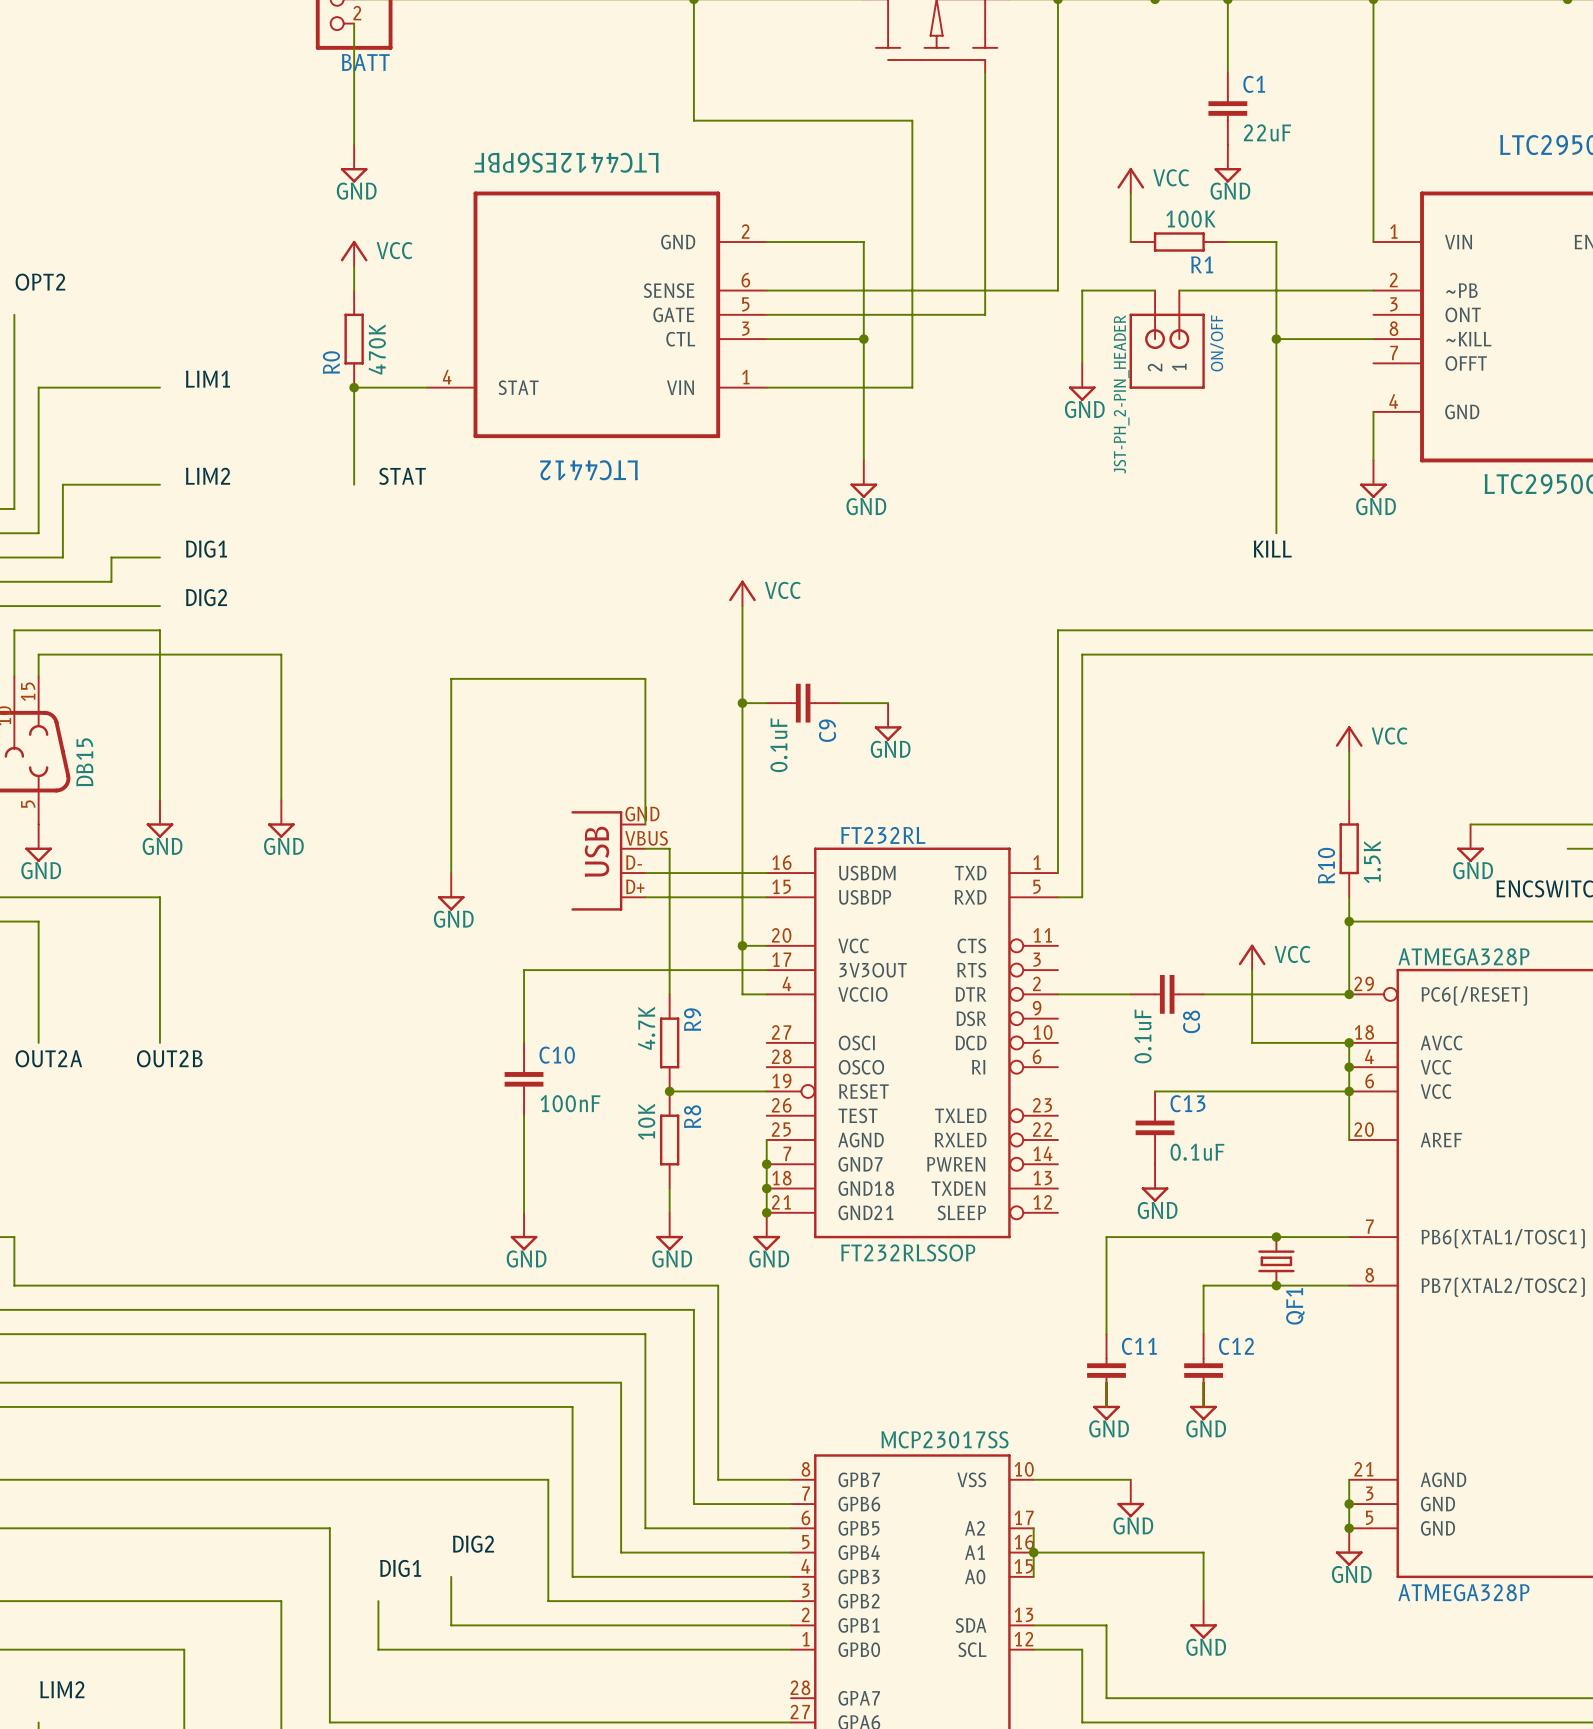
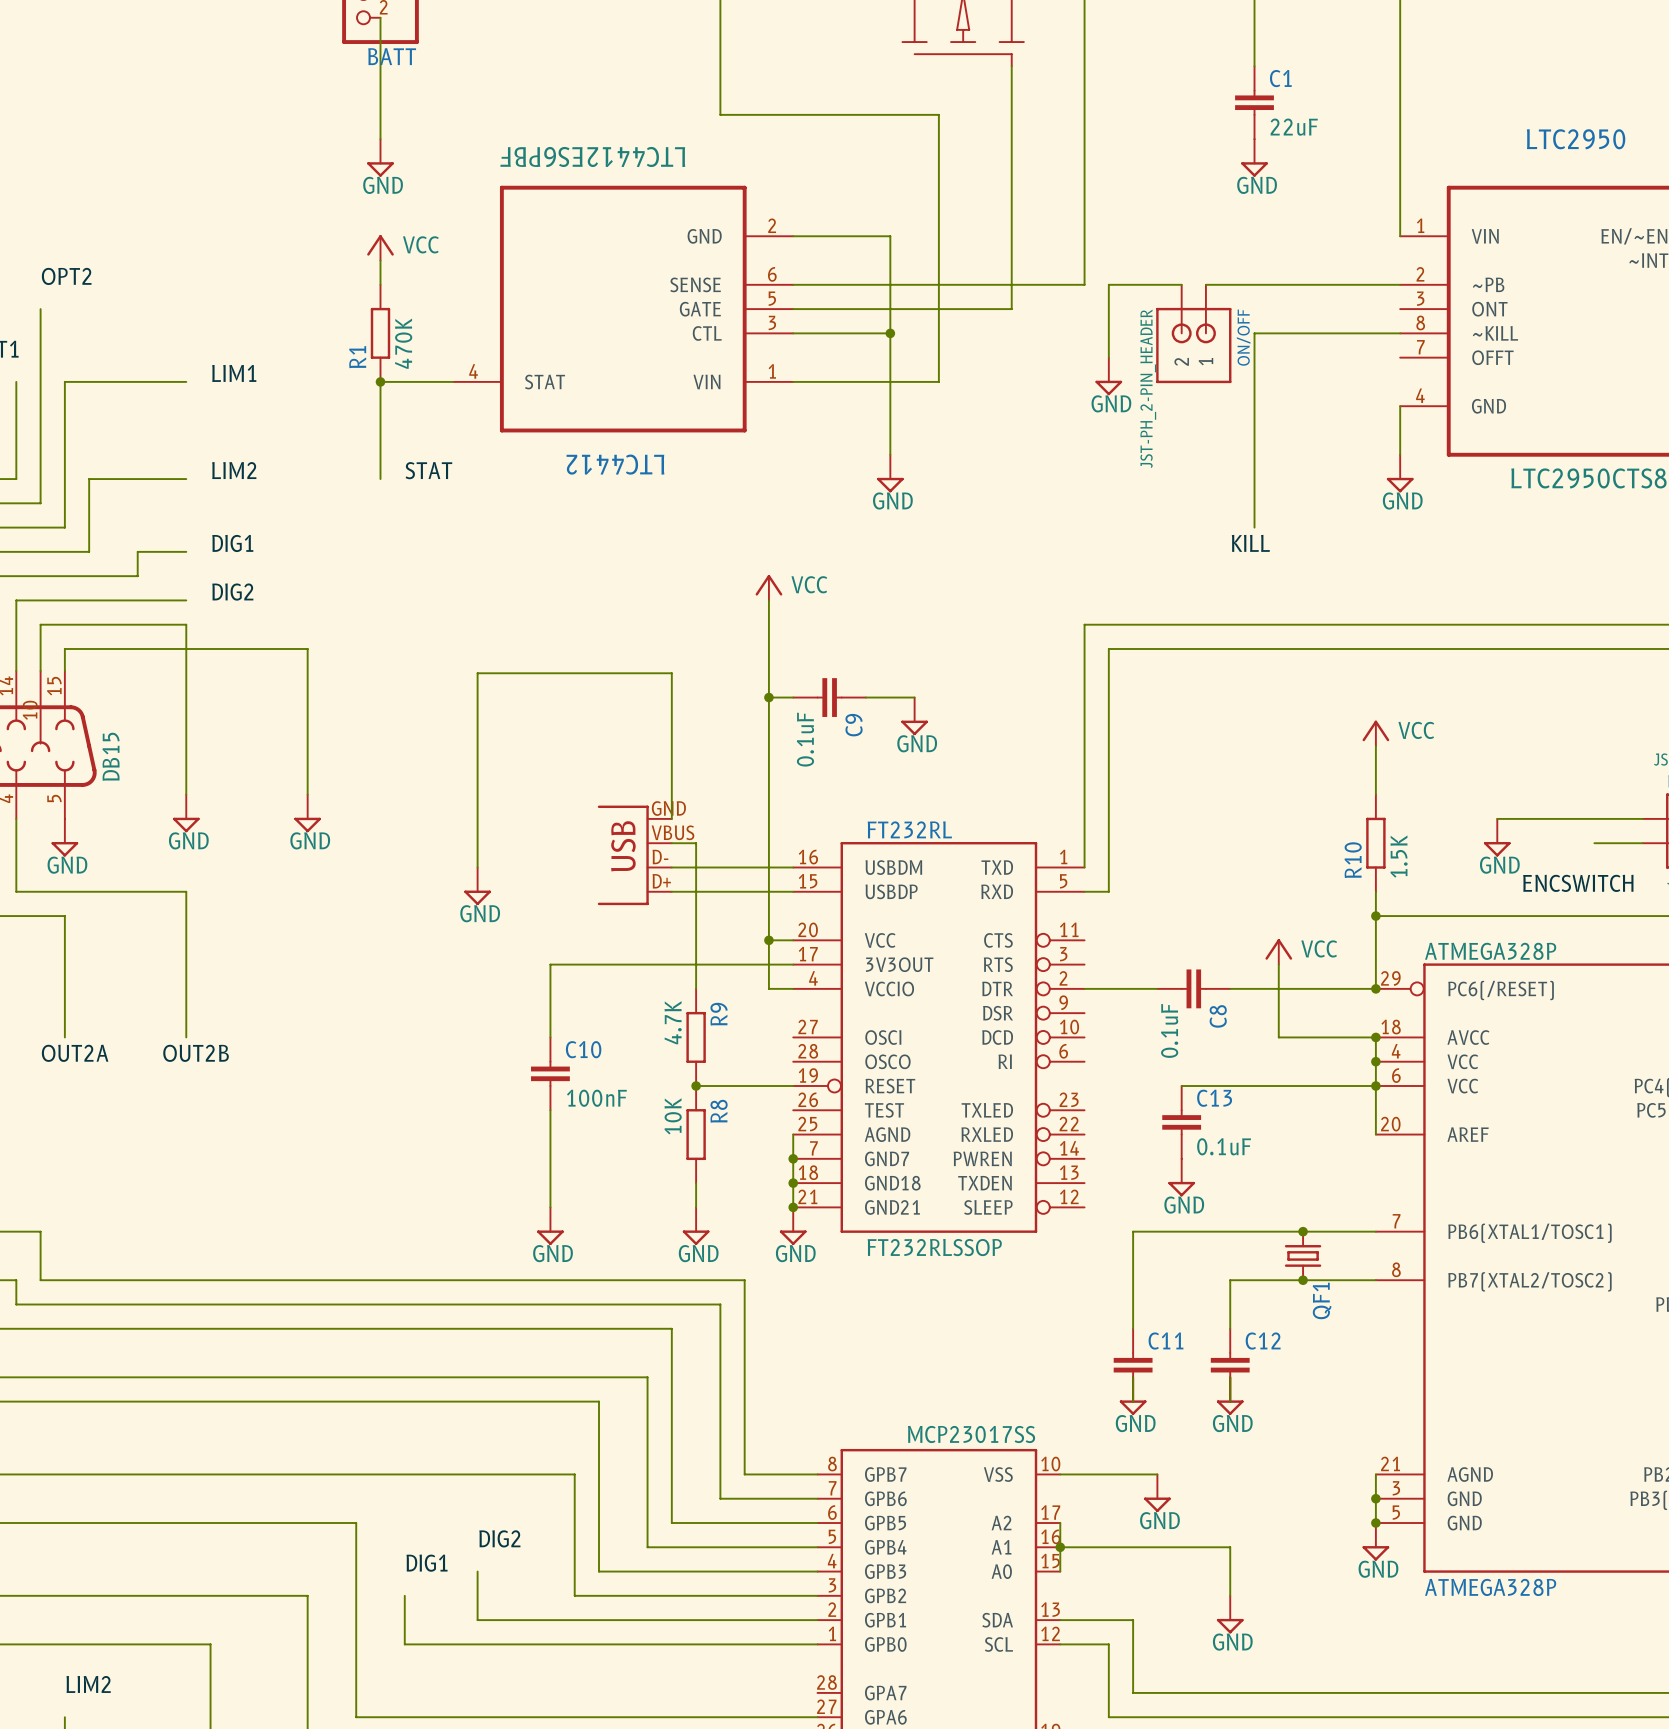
power symbol: VCC (1130, 180) -> none
wire: (1130, 193) (1130, 242) -> none
R1: 100K (1179, 242) -> none
wire: (1227, 242) (1276, 242) (1276, 533) -> none
wire: none -> (1303, 333) (1254, 333) (1254, 527)
junction: (1276, 339) -> none
R0 name: R0 (331, 362) -> R1 (357, 357)
label position: KILL (1272, 549) -> KILL (1250, 543)

